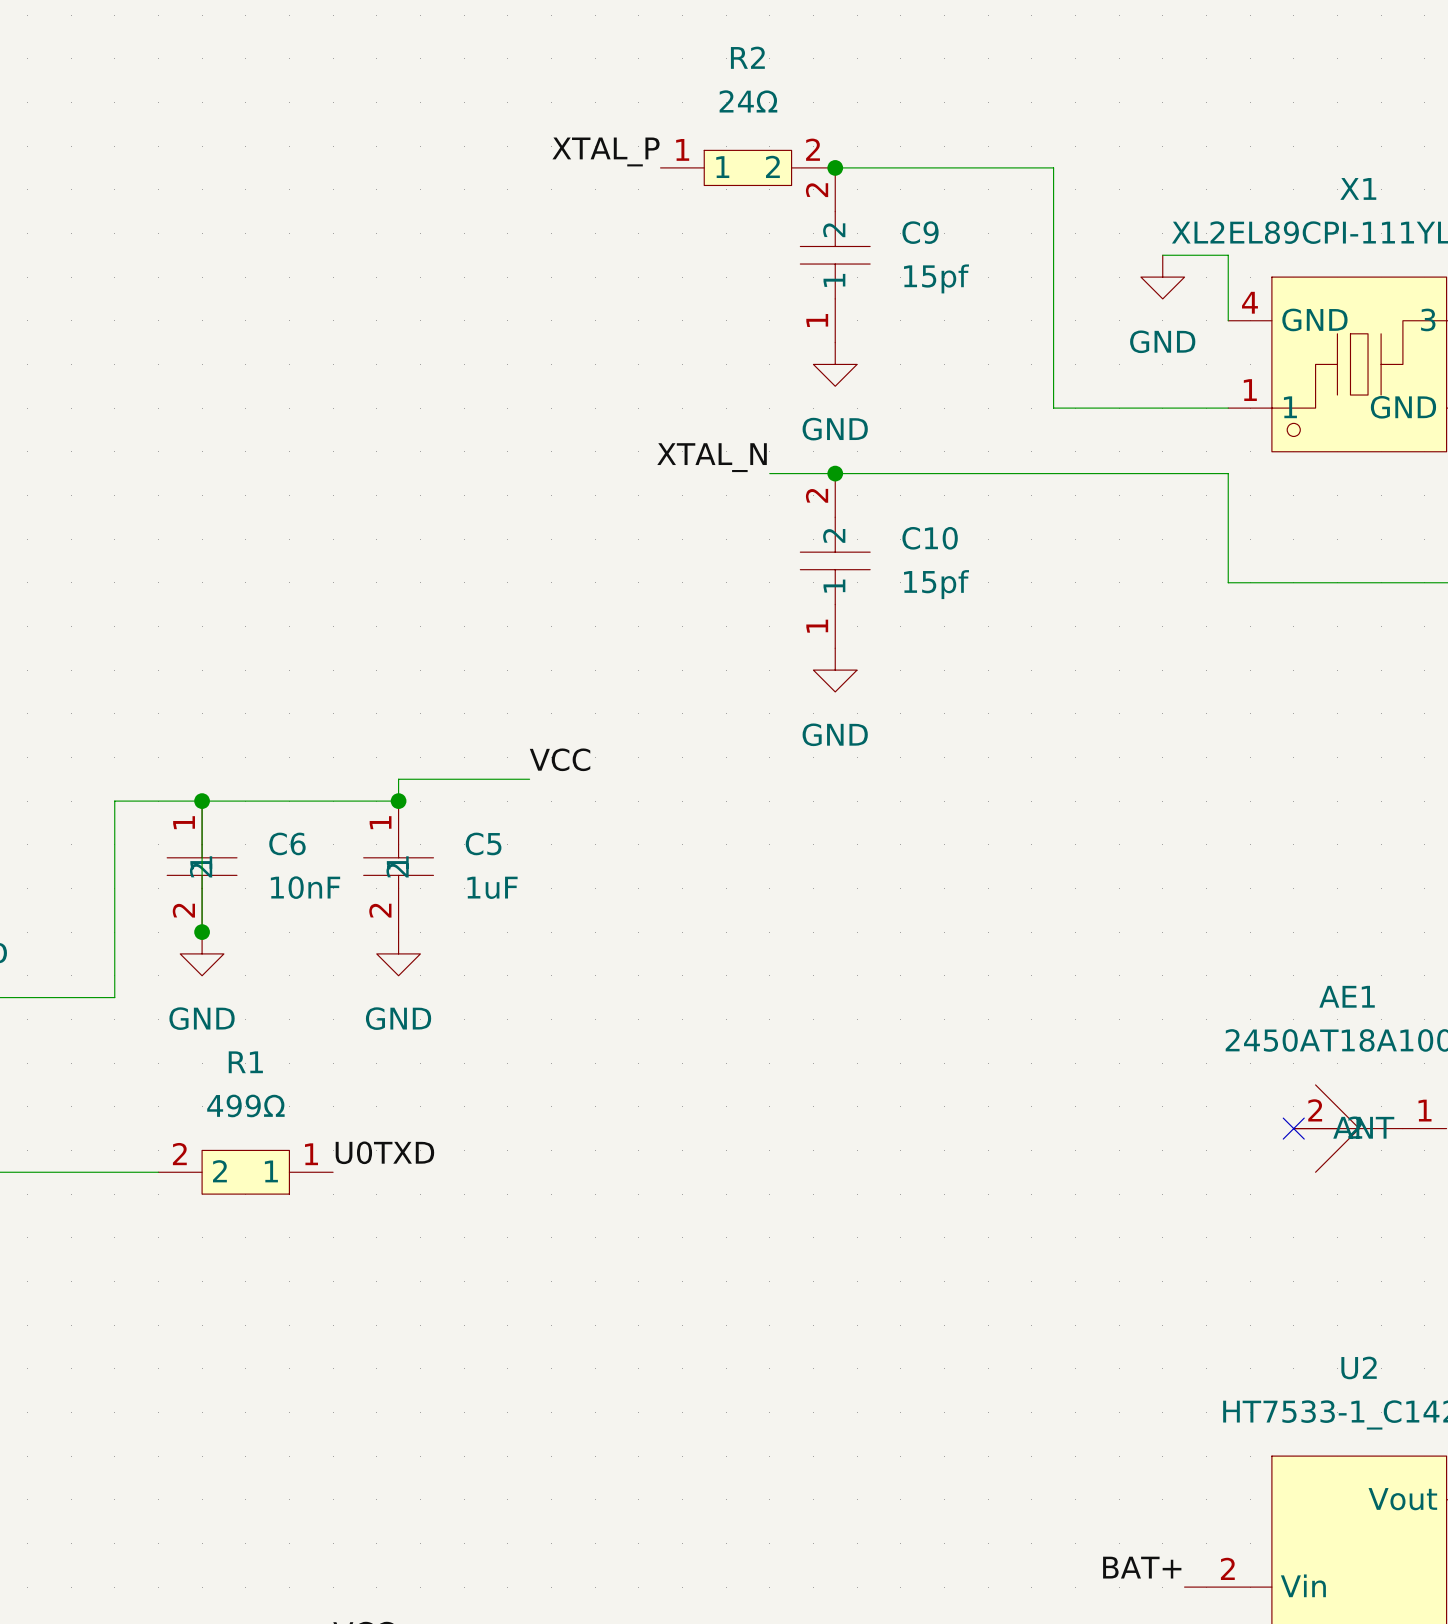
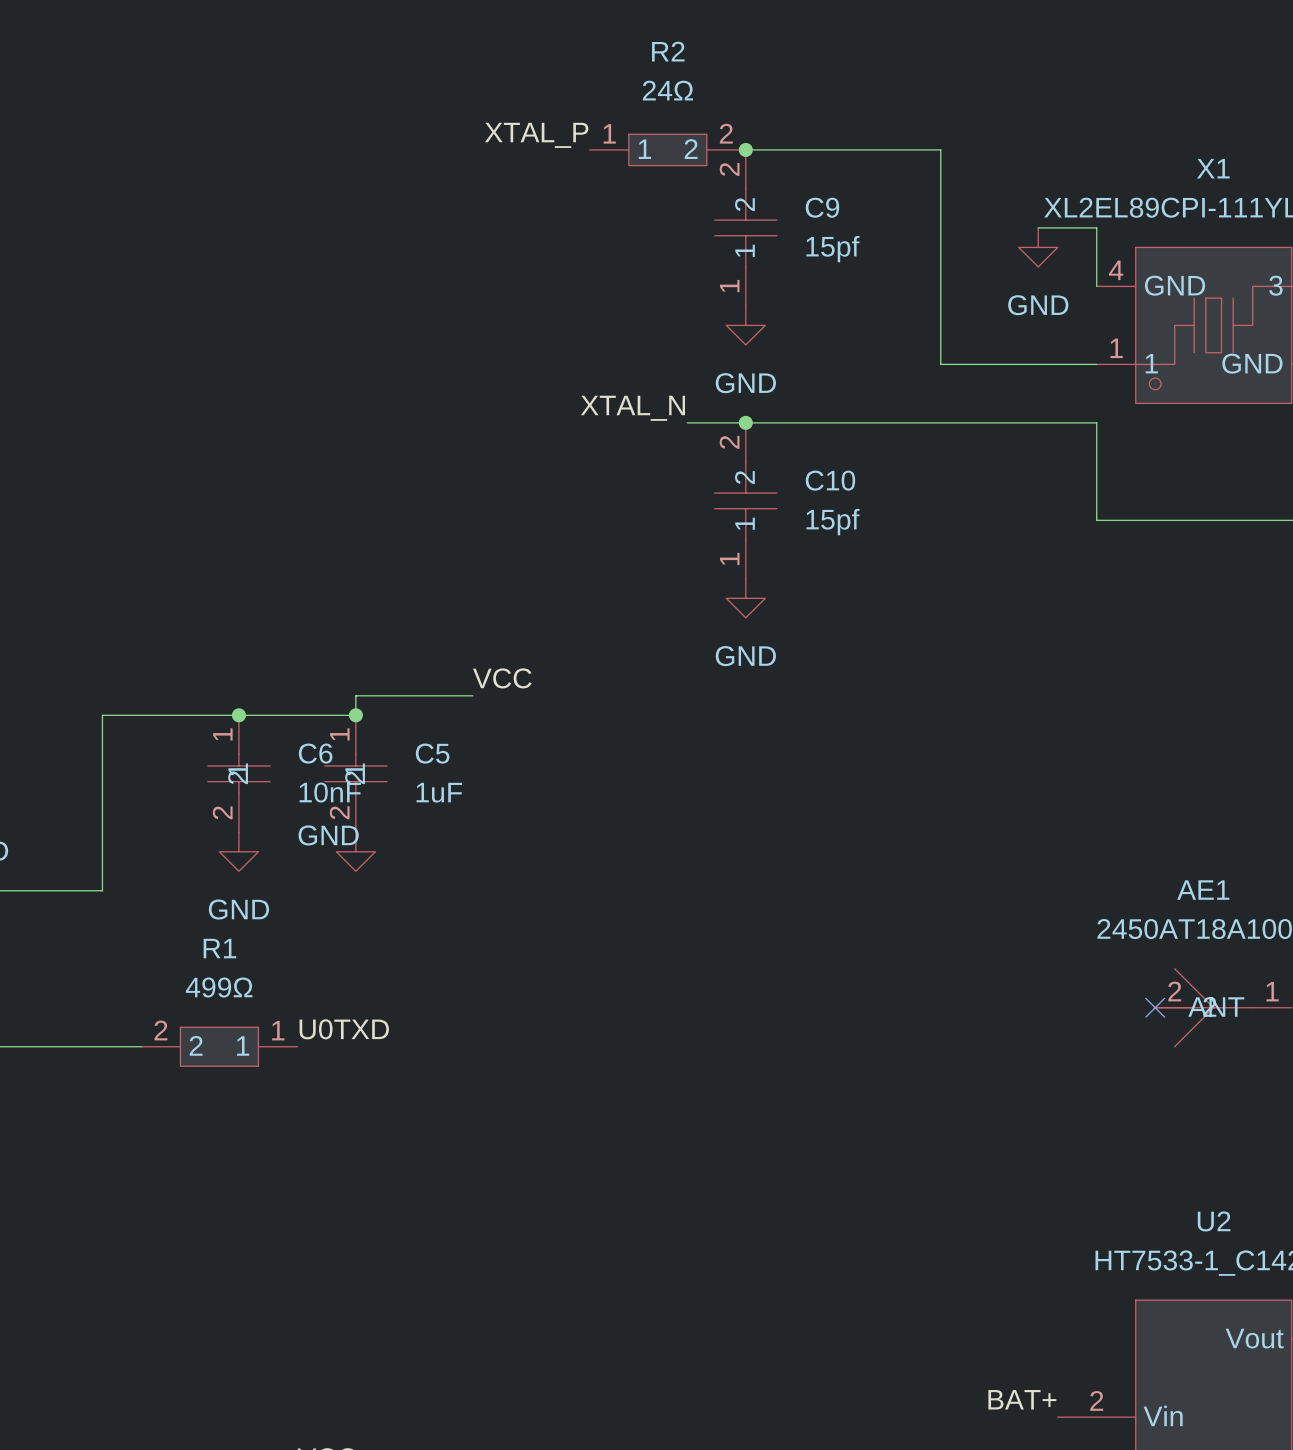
wire: (202, 801) (202, 932) -> none
junction position: (202, 801) -> (238, 715)
C6 position: (202, 866) -> (238, 773)
junction: (202, 932) -> none
power symbol position: GND (202, 953) -> GND (238, 851)
power symbol text position: GND (398, 1018) -> GND (328, 835)

